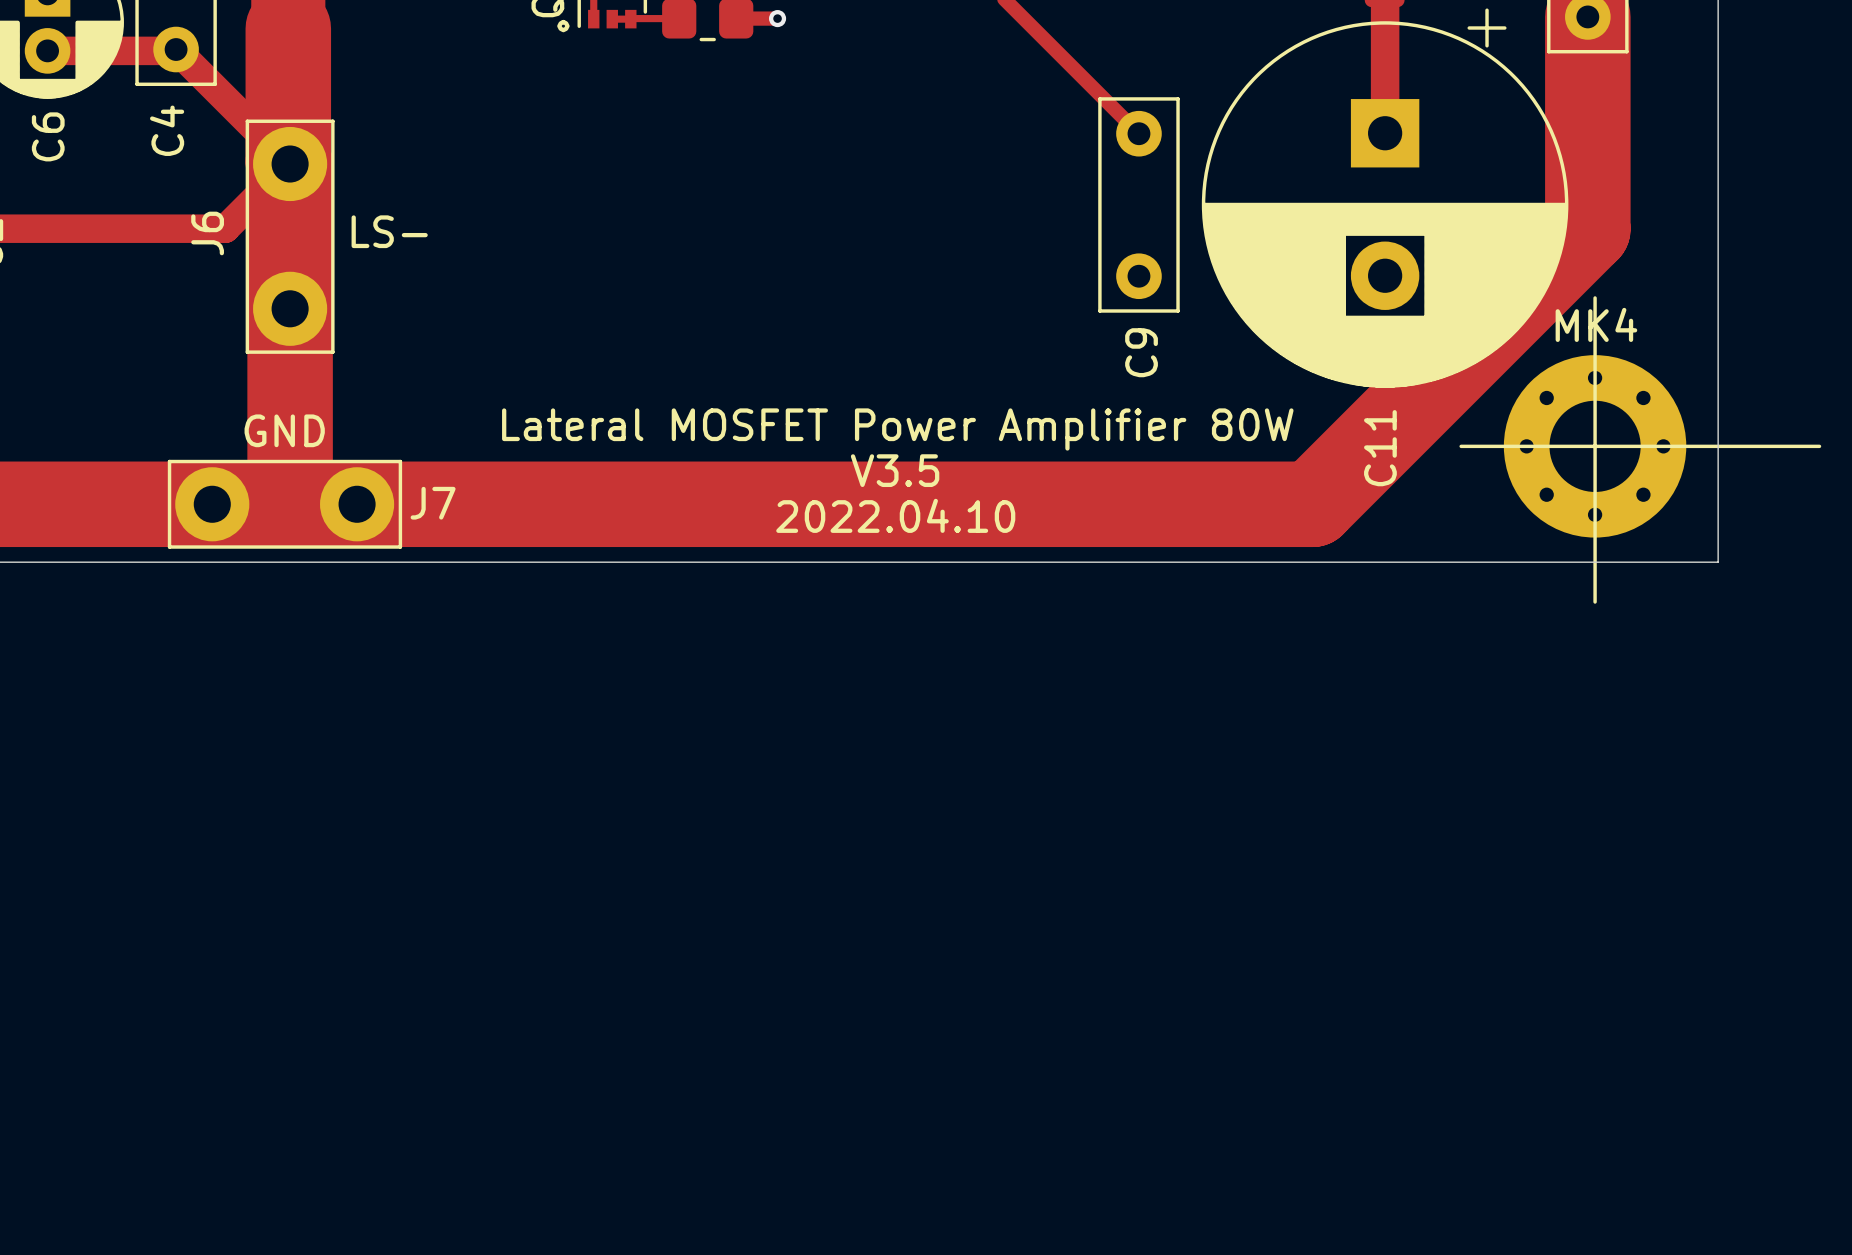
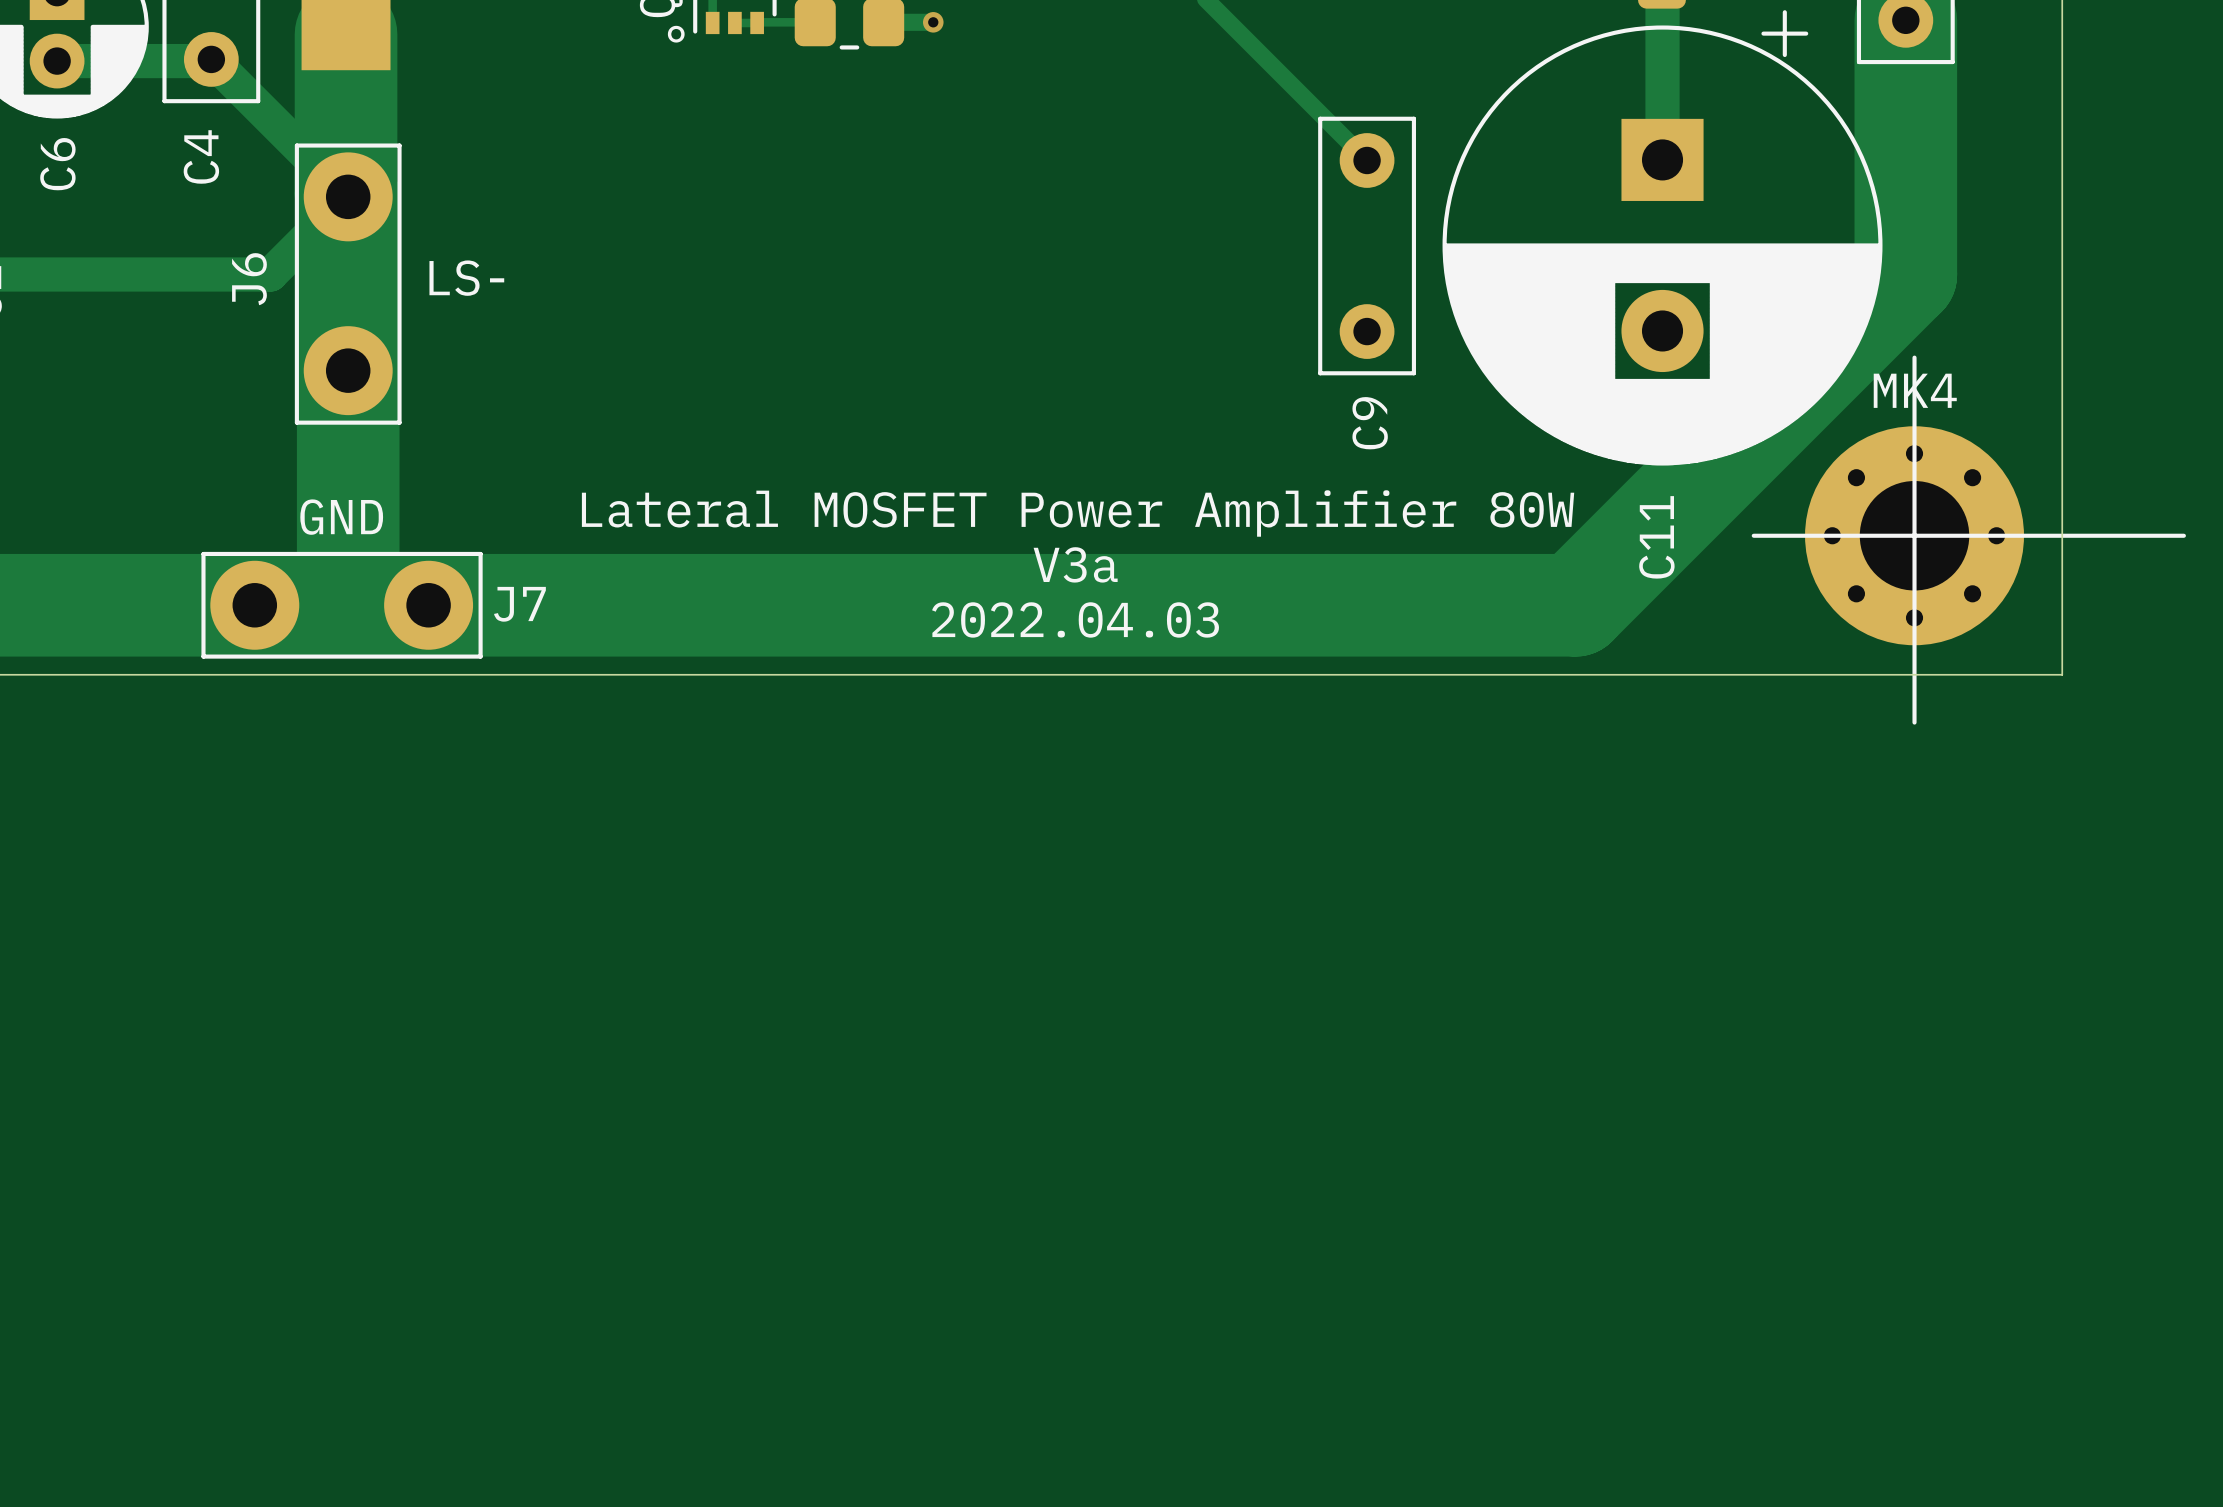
text: V3.5 (895, 470) -> V3a (1075, 564)
text: 2022.04.10 (895, 515) -> 2022.04.03 (1075, 619)

